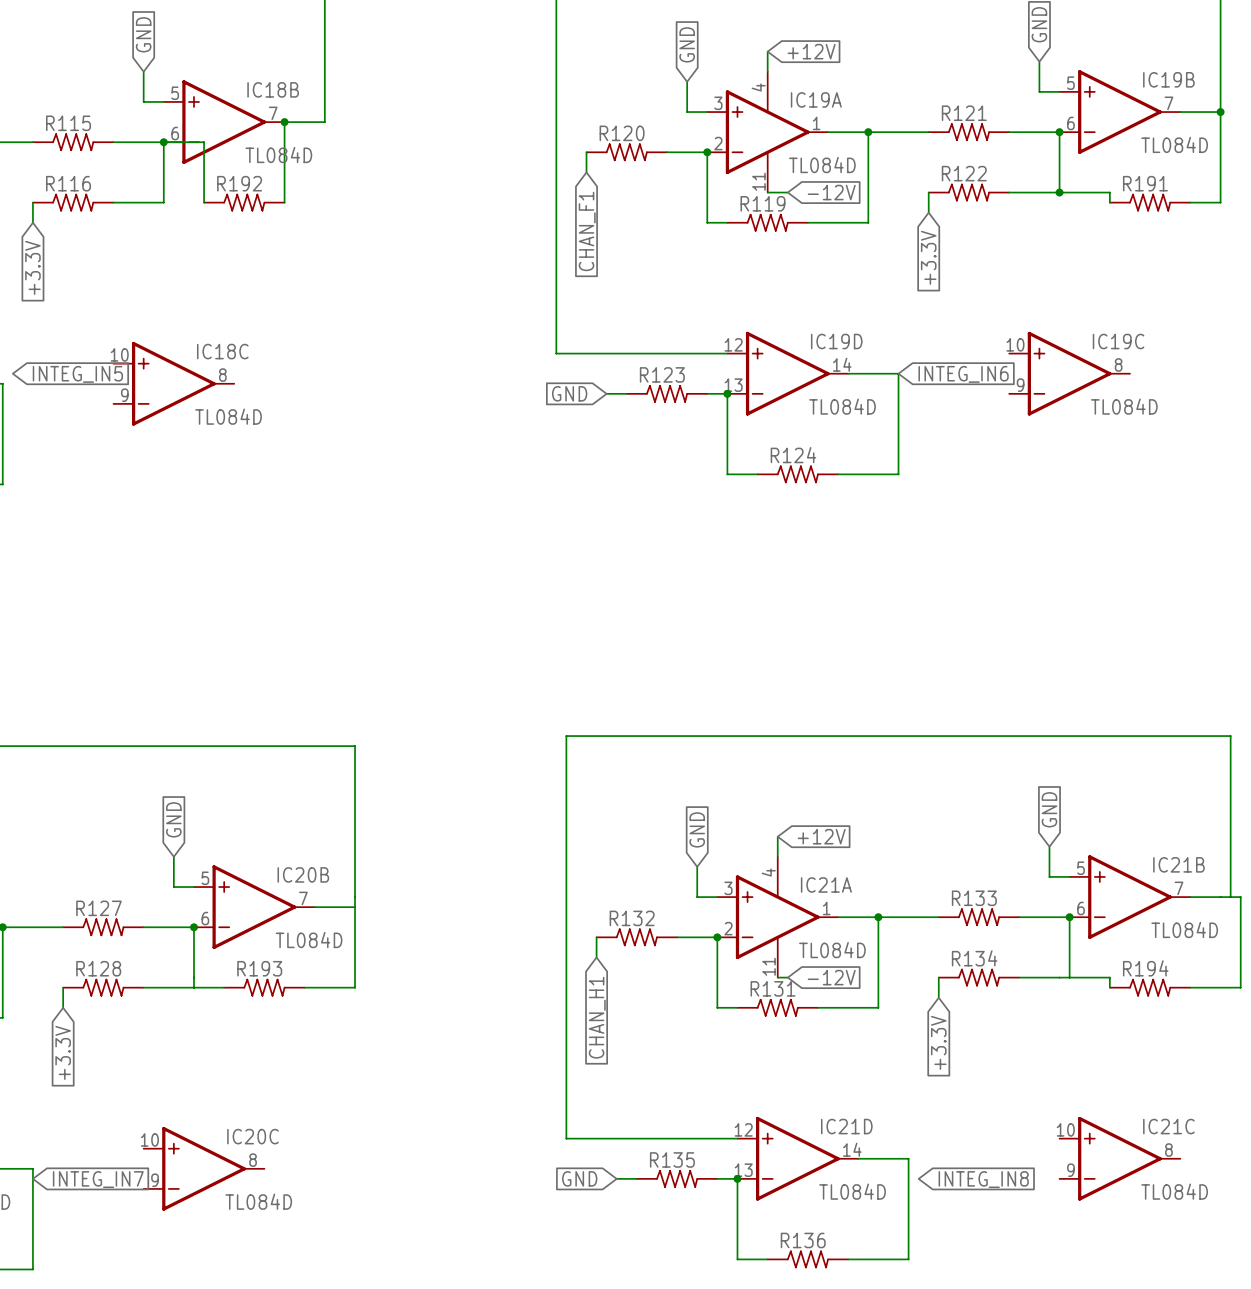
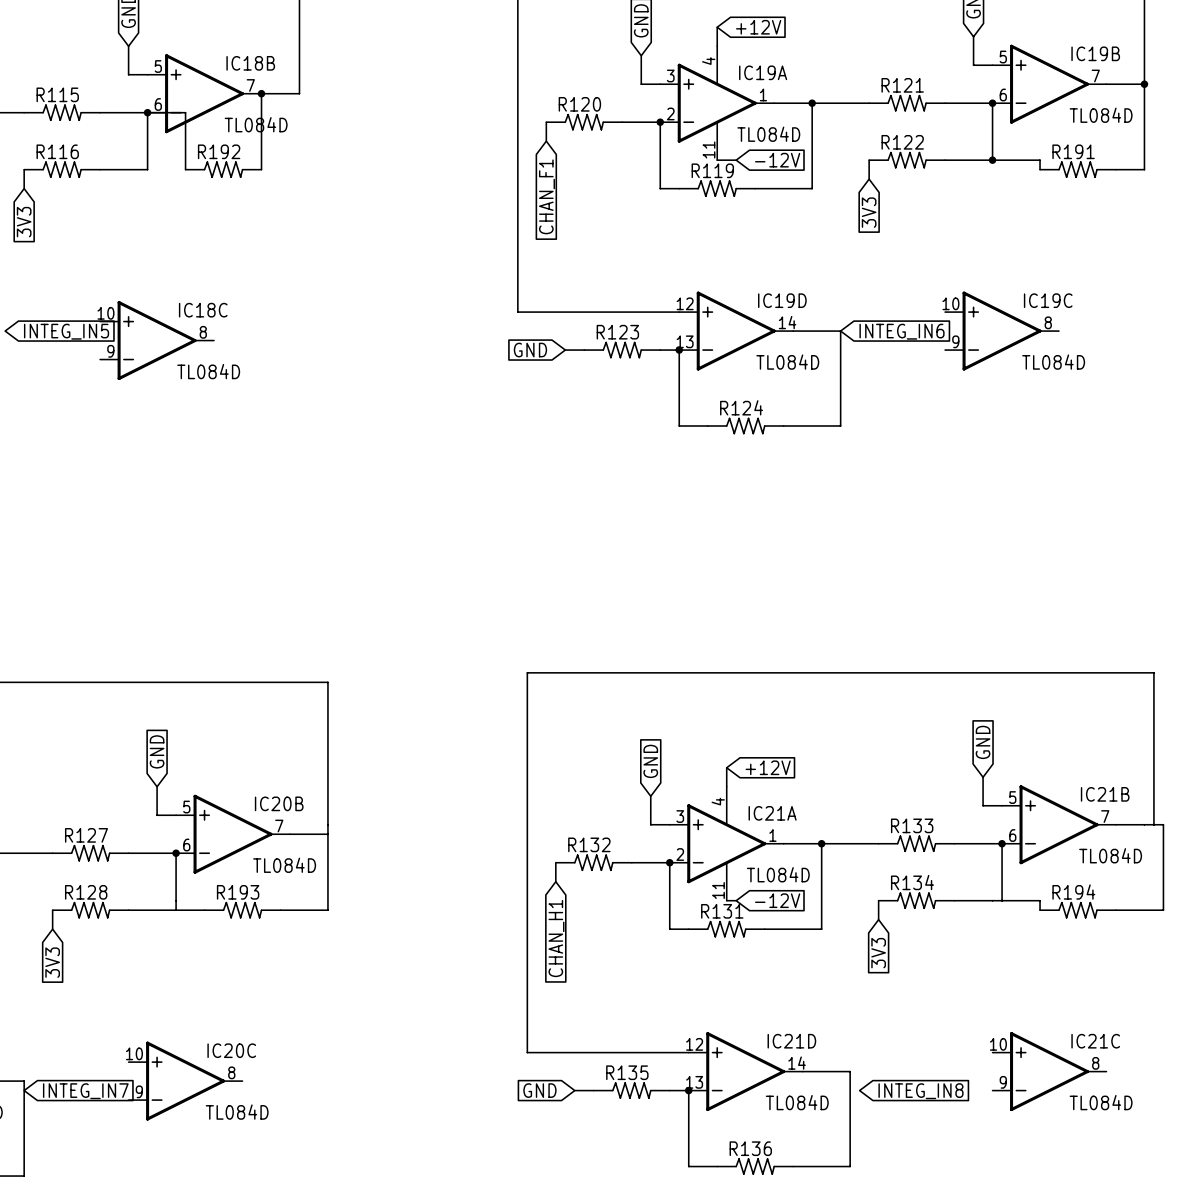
global label: +3.3V (928, 257) -> 3V3 (869, 212)
global label: +3.3V (32, 267) -> 3V3 (24, 222)
global label: +3.3V (938, 1042) -> 3V3 (878, 953)
global label: +3.3V (63, 1052) -> 3V3 (52, 962)

